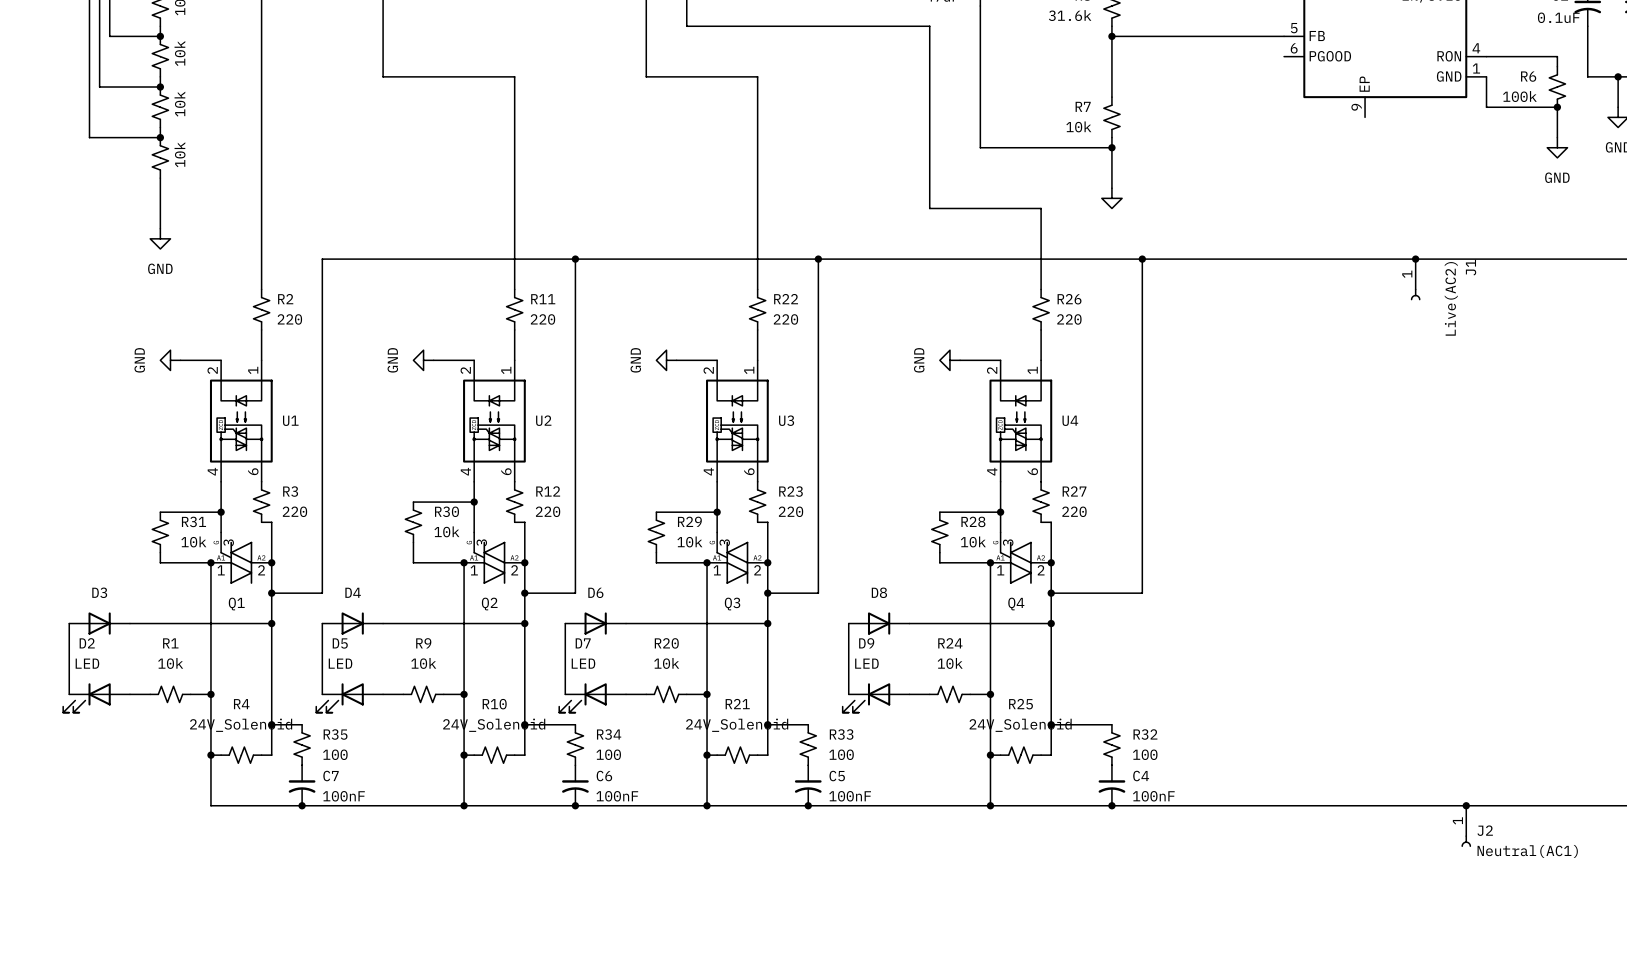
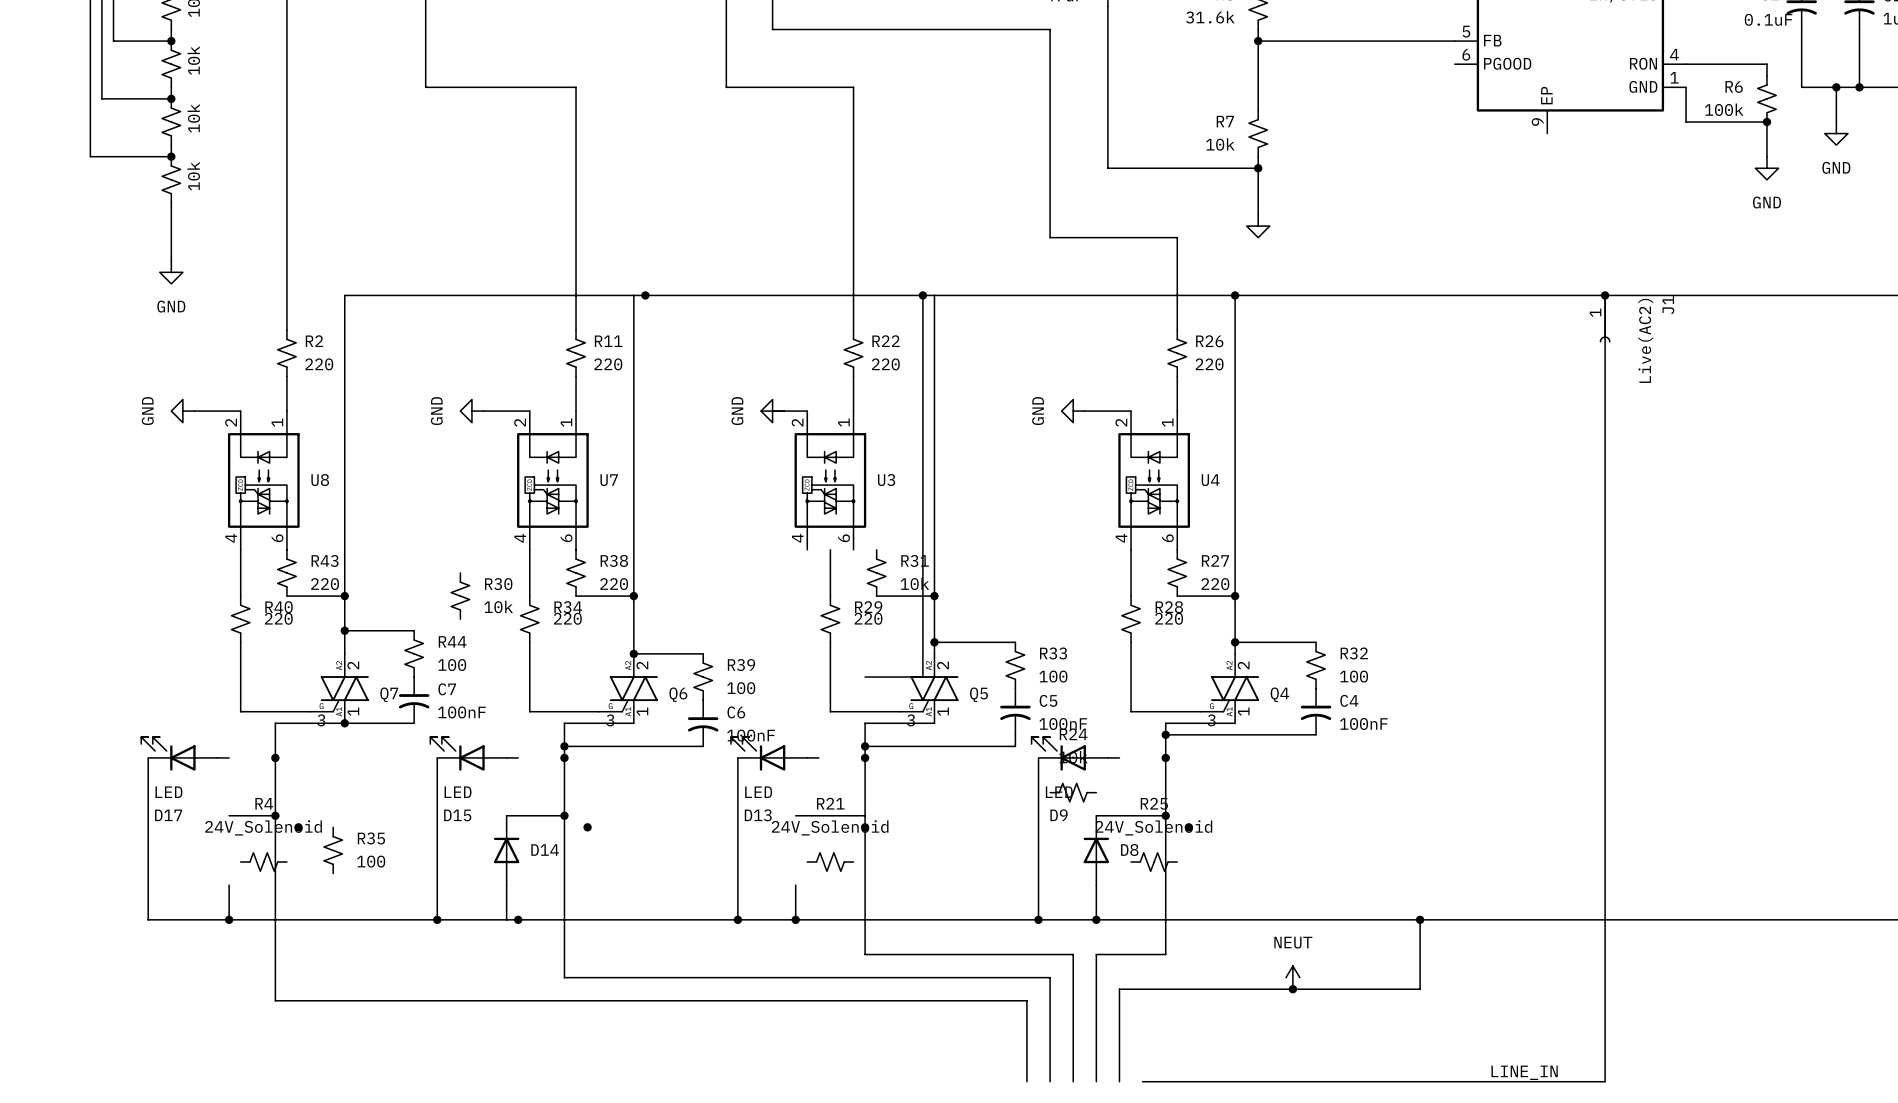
wire: (322, 259) (322, 593) (271, 593) -> (356, 295) (344, 295) (344, 653)
wire: none -> (633, 295) (633, 653) (703, 653)
wire: (575, 259) (575, 593) (524, 593) -> none
wire: none -> (934, 295) (934, 653)
wire: none -> (1235, 295) (1235, 653)
junction: none -> (1235, 295)
wire: (1142, 259) (1142, 593) (1051, 593) -> none
junction: (1142, 259) -> none
wire: none -> (1605, 295) (1605, 1081) (1142, 1081)
power symbol position: GND (666, 360) -> GND (772, 411)
U1 name: U1 (290, 420) -> U8 (320, 480)
U2 name: U2 (543, 420) -> U7 (609, 480)
wire: (717, 481) (717, 532) -> none
wire: none -> (830, 549) (830, 596)
R3 name: R3 (290, 491) -> R43 (325, 560)
R12 name: R12 (548, 491) -> R38 (614, 560)
wire: (413, 502) (474, 502) -> (344, 630) (414, 630)
junction: (474, 502) -> none
R23: 220 (757, 502) -> none
wire: (160, 512) (221, 512) -> none
junction: (221, 512) -> none
wire: (656, 512) (717, 512) -> none
junction: (717, 512) -> none
wire: (939, 512) (1000, 512) -> none
junction: (1000, 512) -> none
wire: (271, 522) (271, 755) (261, 755) -> (298, 596) (344, 596)
junction: none -> (344, 596)
wire: (524, 522) (524, 755) (514, 755) -> (587, 596) (633, 596)
junction: none -> (633, 596)
wire: (757, 522) (767, 522) (767, 633) -> (934, 723) (865, 723)
wire: none -> (876, 596) (934, 596)
junction: none -> (934, 596)
wire: (1051, 522) (1051, 755) (1041, 755) -> (1188, 596) (1235, 596)
junction: none -> (1235, 596)
R31 position: (160, 532) -> (876, 572)
R29 position: (656, 532) -> (830, 619)
R28 position: (939, 532) -> (1131, 619)
R29 value: 10k (689, 541) -> 220 (868, 618)
R28 value: 10k (973, 541) -> 220 (1169, 618)
R40: none -> 220 (240, 619)
wire: (413, 542) (413, 562) (464, 562) (464, 805) -> none
wire: (160, 552) (160, 562) (210, 562) (210, 775) -> none
junction: none -> (344, 630)
wire: (656, 552) (656, 562) (707, 562) (707, 775) -> none
wire: (939, 552) (939, 562) (990, 562) (990, 805) -> none
Q1: (241, 558) -> none
Q2: (494, 558) -> none
Q3: (737, 558) -> none
Q4 position: (1020, 558) -> (1229, 688)
junction: (210, 562) -> none
junction: (271, 562) -> none
junction: (464, 562) -> none
junction: (524, 562) -> none
junction: (707, 562) -> none
junction: (767, 562) -> none
wire: none -> (934, 642) (1015, 642)
junction: none -> (934, 642)
junction: (990, 562) -> none
Q4 rotation: 0° (1016, 562) -> 90° counterclockwise (1235, 693)
junction: (1051, 562) -> none
wire: none -> (1235, 642) (1316, 642)
junction: none -> (1235, 642)
R44: none -> 100 (414, 653)
junction: none -> (633, 653)
D8 name position: D8 (879, 592) -> D8 (1129, 850)
junction: (271, 593) -> none
junction: (524, 593) -> none
R39: none -> 100 (703, 677)
junction: (767, 593) -> none
junction: (1051, 593) -> none
Q7: none -> (339, 688)
Q6: none -> (628, 688)
Q5: none -> (929, 688)
wire: (69, 623) (69, 694) -> none
D3: (99, 623) -> none
wire: (129, 623) (221, 623) -> (240, 642) (240, 711)
wire: none -> (298, 711) (310, 711)
junction: (271, 623) -> none
wire: (322, 623) (322, 694) -> none
D4: (352, 623) -> none
wire: (383, 623) (474, 623) -> (529, 642) (529, 711)
wire: none -> (587, 711) (599, 711)
junction: (524, 623) -> none
wire: (565, 623) (565, 694) -> none
D6: (595, 623) -> none
wire: (626, 623) (737, 623) -> (830, 642) (830, 711)
wire: none -> (865, 711) (899, 711)
junction: (767, 623) -> none
wire: (848, 623) (848, 694) -> none
D8 rotation: 0° (879, 623) -> 90° counterclockwise (1096, 850)
D8 position: (879, 623) -> (1096, 850)
wire: (909, 623) (1000, 623) -> (1131, 642) (1131, 711)
wire: none -> (1188, 711) (1200, 711)
junction: (1051, 623) -> none
junction: none -> (344, 723)
wire: none -> (414, 723) (275, 723) (275, 1000) (1026, 1000) (1026, 1081)
wire: none -> (633, 723) (564, 723) (564, 977) (1050, 977) (1050, 1081)
wire: none -> (1235, 723) (1165, 723) (1165, 954) (1096, 954) (1096, 1081)
wire: none -> (1015, 734) (1015, 746) (865, 746)
wire: none -> (1165, 734) (1316, 734)
junction: none -> (1165, 734)
wire: none -> (564, 746) (703, 746)
junction: none -> (564, 746)
junction: none -> (865, 746)
D17: none -> LED (179, 753)
D15: none -> LED (468, 753)
D13: none -> LED (769, 753)
wire: none -> (148, 757) (148, 919) (229, 919)
junction: none -> (275, 757)
wire: none -> (437, 757) (437, 919)
junction: none -> (564, 757)
wire: none -> (737, 757) (737, 919)
junction: none -> (865, 757)
wire: none -> (1038, 757) (1038, 919)
junction: none -> (1165, 757)
wire: (129, 694) (150, 694) -> none
R1: 10k (170, 694) -> none
wire: (190, 694) (210, 694) -> none
junction: (210, 694) -> none
wire: (383, 694) (403, 694) -> none
R9: 10k (423, 694) -> none
wire: (443, 694) (464, 694) -> none
junction: (464, 694) -> none
wire: (626, 694) (646, 694) -> none
R20: 10k (666, 694) -> none
wire: (686, 694) (707, 694) -> none
junction: (707, 694) -> none
wire: (909, 694) (929, 694) -> none
wire: (970, 694) (990, 694) -> none
junction: (990, 694) -> none
D2: LED (96, 697) -> none
D5: LED (349, 697) -> none
D7: LED (592, 697) -> none
D9 flip: as is (866, 697) -> up-down (1058, 753)
D9 position: (876, 697) -> (1069, 753)
wire: none -> (229, 815) (275, 815)
junction: none -> (275, 815)
junction: none -> (564, 815)
wire: none -> (795, 815) (865, 815)
junction: none -> (1165, 815)
wire: (271, 724) (302, 724) -> none
wire: (524, 724) (575, 724) -> (506, 815) (564, 815)
wire: (767, 724) (808, 724) -> none
wire: (1051, 724) (1111, 724) -> (1096, 815) (1165, 815)
D14: none -> (506, 850)
R34 position: (575, 745) -> (529, 619)
R33 position: (808, 745) -> (1015, 665)
R32 position: (1111, 745) -> (1316, 665)
R34 value: 100 (608, 754) -> 220 (567, 618)
wire: (210, 755) (221, 755) -> (217, 757) (229, 757)
junction: (210, 755) -> none
wire: (464, 755) (474, 755) -> (506, 757) (518, 757)
junction: (464, 755) -> none
R10: 24V_Solenoid (494, 755) -> none
wire: (707, 755) (717, 755) -> (807, 757) (818, 757)
junction: (707, 755) -> none
wire: (757, 755) (767, 755) -> (1073, 1081) (1073, 954) (865, 954) (865, 862)
wire: (990, 755) (1000, 755) -> (1107, 757) (1119, 757)
junction: (990, 755) -> none
wire: none -> (506, 885) (506, 919)
wire: none -> (1096, 885) (1096, 919)
C7 position: (302, 785) -> (414, 700)
C6 position: (575, 785) -> (703, 723)
C5 position: (808, 785) -> (1015, 711)
C4 position: (1111, 785) -> (1316, 711)
junction: none -> (229, 919)
junction: (302, 805) -> none
junction: none -> (437, 919)
junction: (575, 805) -> none
junction: none -> (737, 919)
junction: (808, 805) -> none
junction: none -> (1038, 919)
junction position: (990, 805) -> (1096, 919)
junction: (1111, 805) -> none
wire: none -> (1420, 919) (1420, 989) (1119, 989) (1119, 1081)
junction: none -> (1420, 919)
junction: (1466, 805) -> none
J2: Neutral(AC1) (1466, 826) -> none
power symbol: none -> NEUT (1292, 977)
junction: none -> (1292, 989)
label: none -> LINE_IN (1524, 1072)

